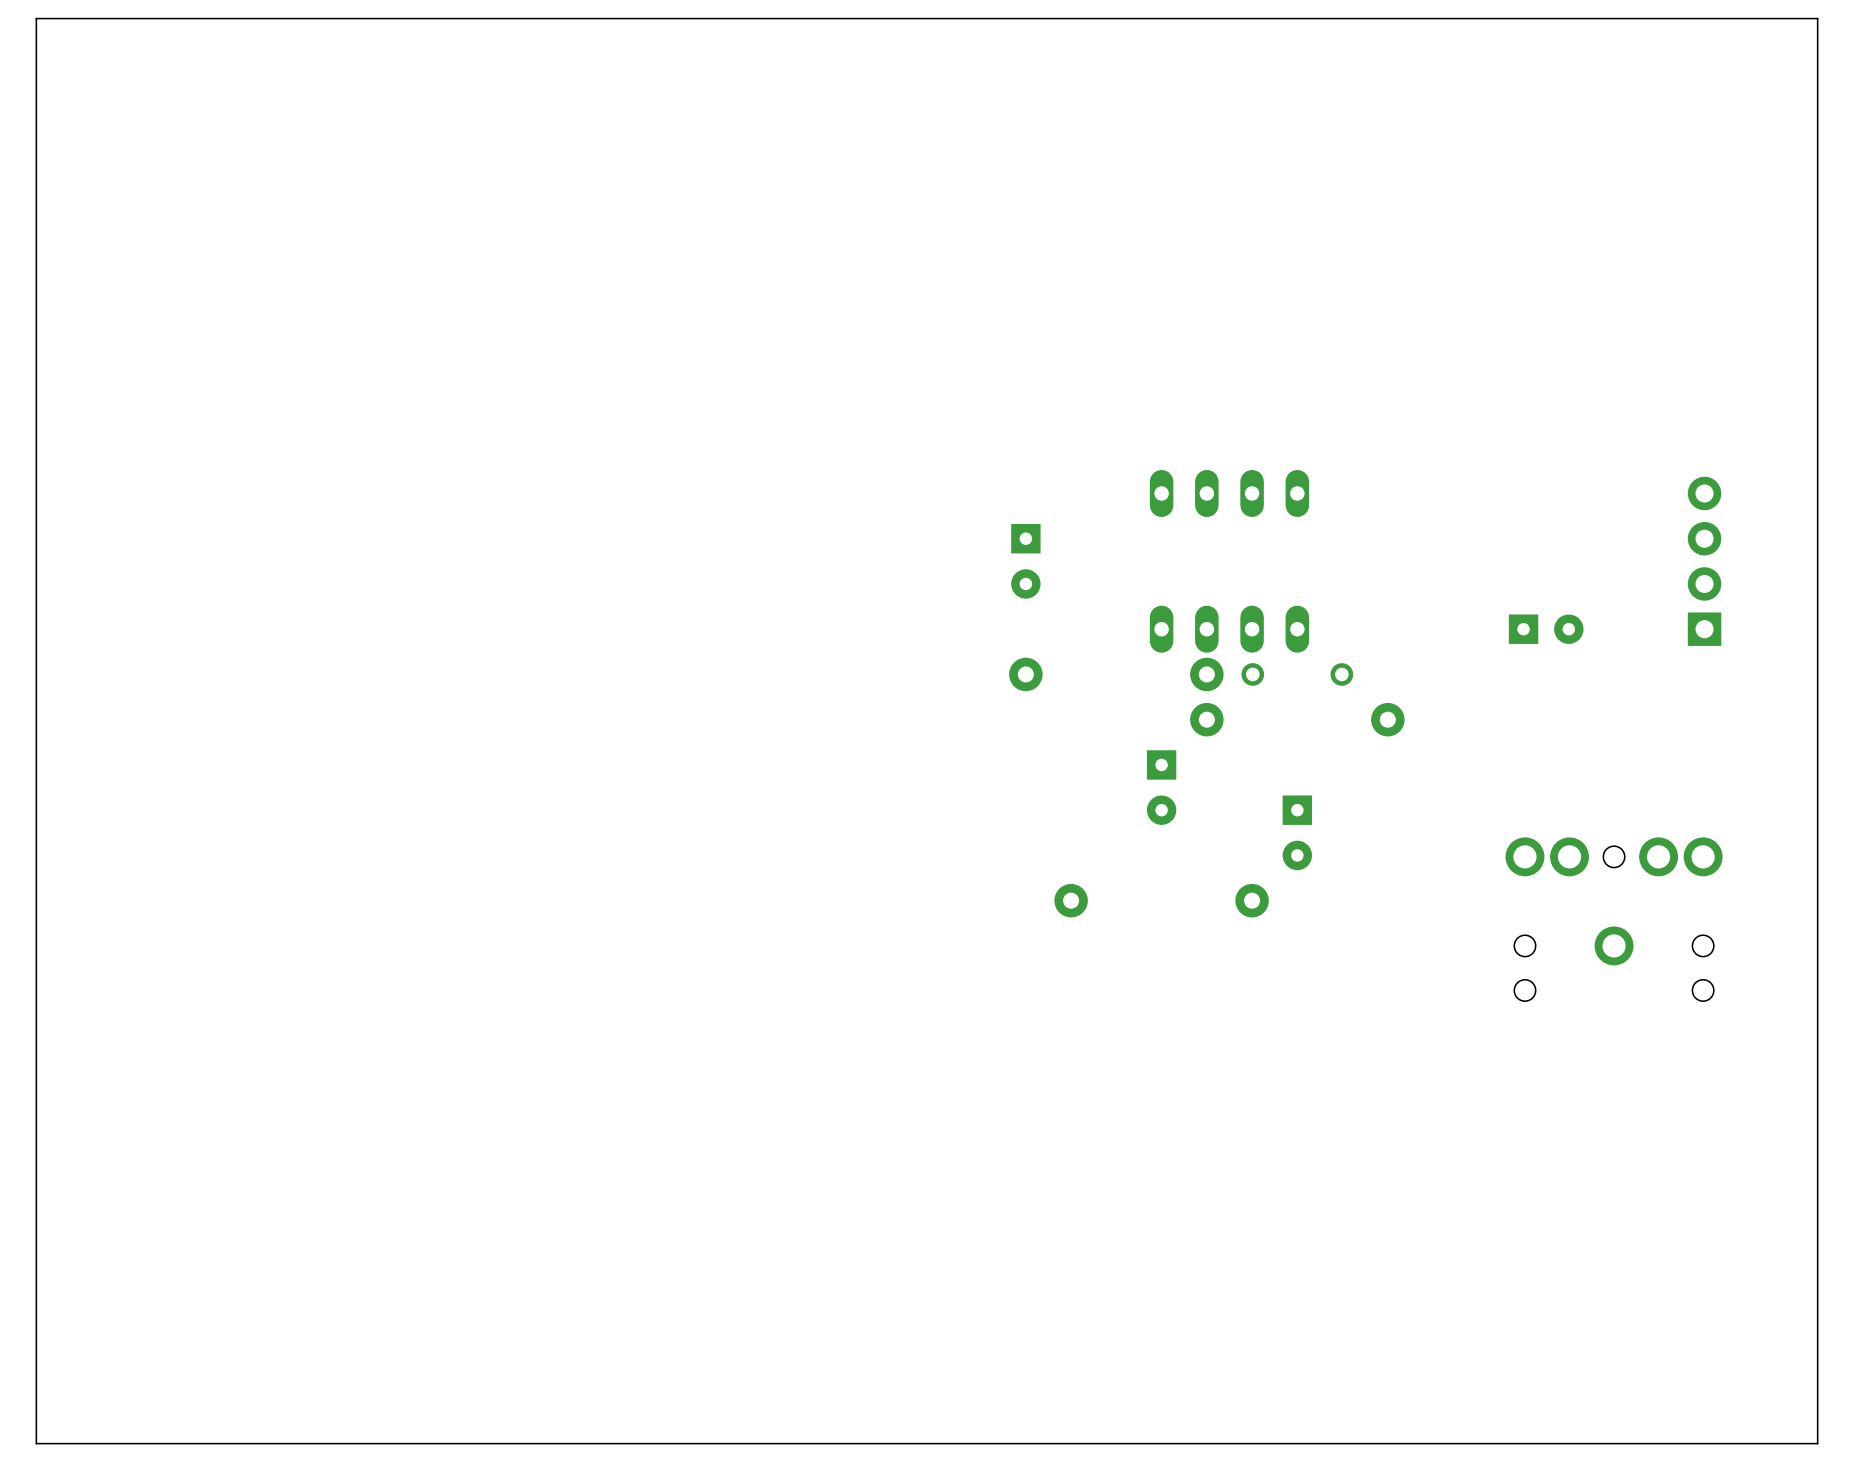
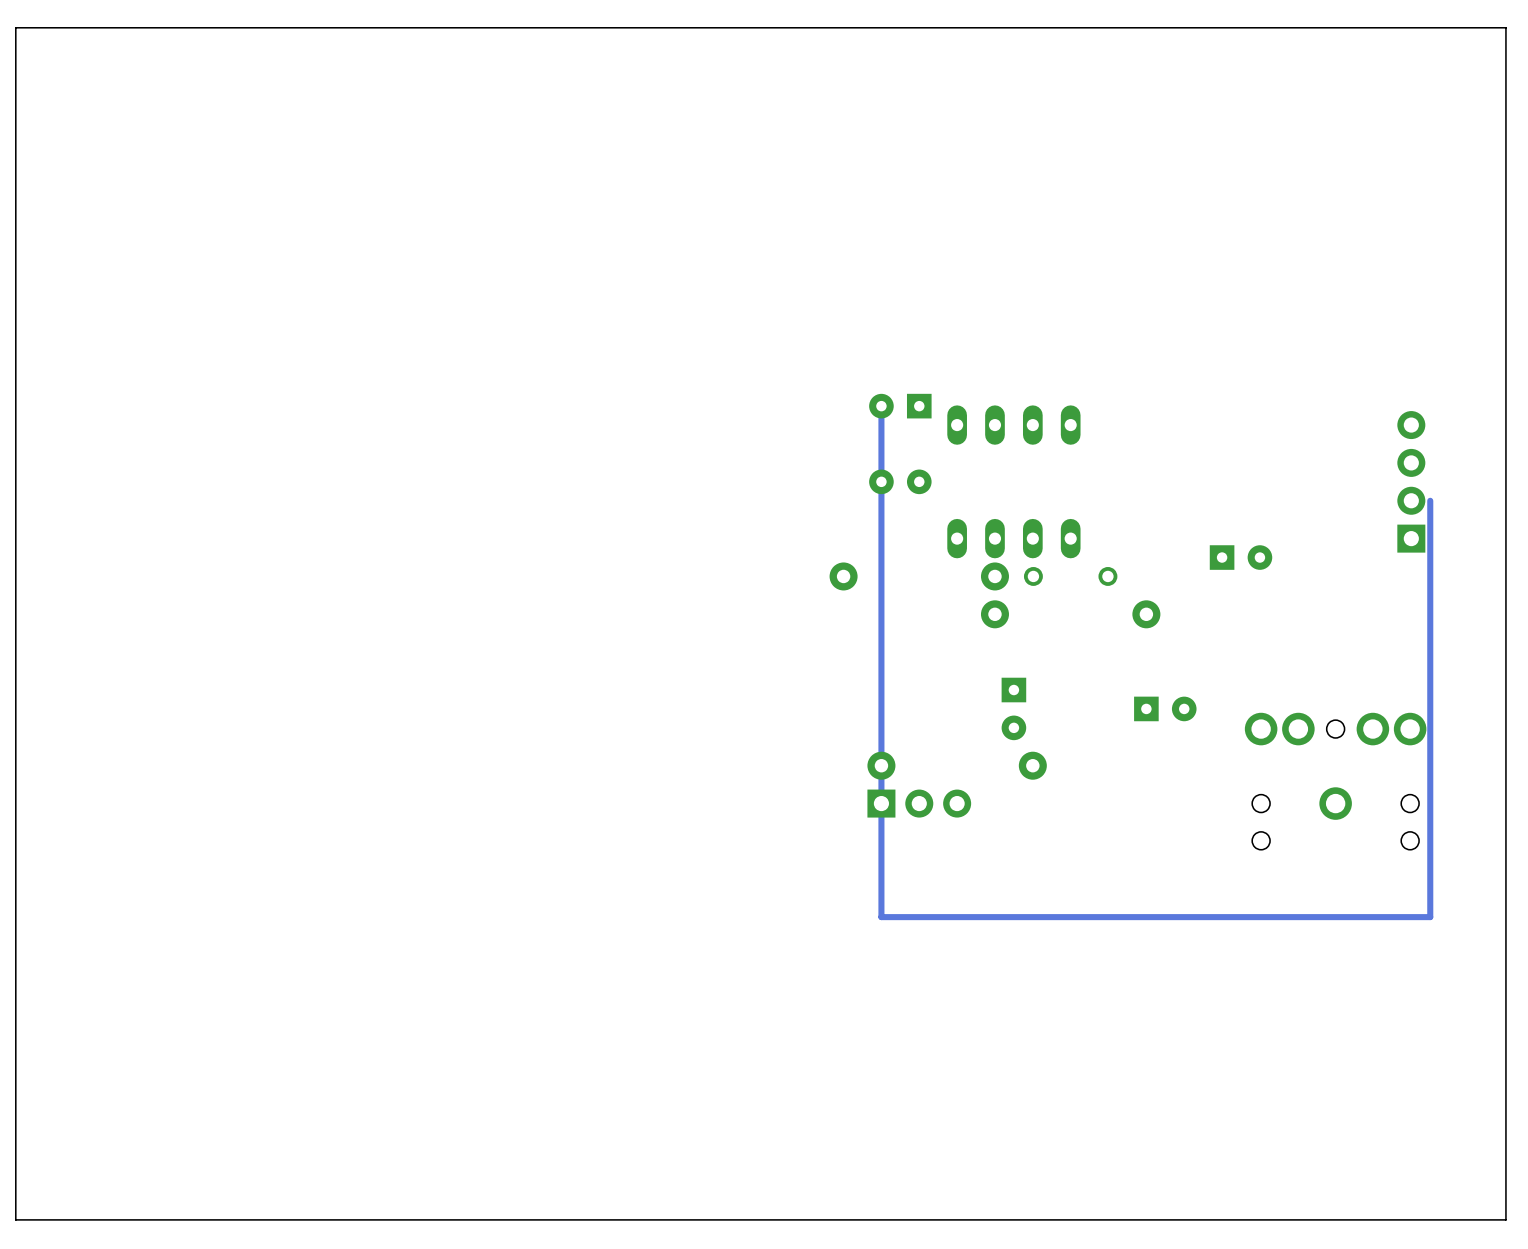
track: none -> (881, 406) (881, 917) (1430, 917) (1430, 500)
part rotation: 0° (1025, 561) -> 90° clockwise (900, 406)
part position: (1025, 561) -> (900, 406)
part: none -> (900, 481)
part position: (1546, 629) -> (1241, 557)
part: (1161, 787) -> none
part: none -> (1013, 708)
part: (1297, 832) -> none
part: none -> (1165, 708)
part: none -> (919, 803)

